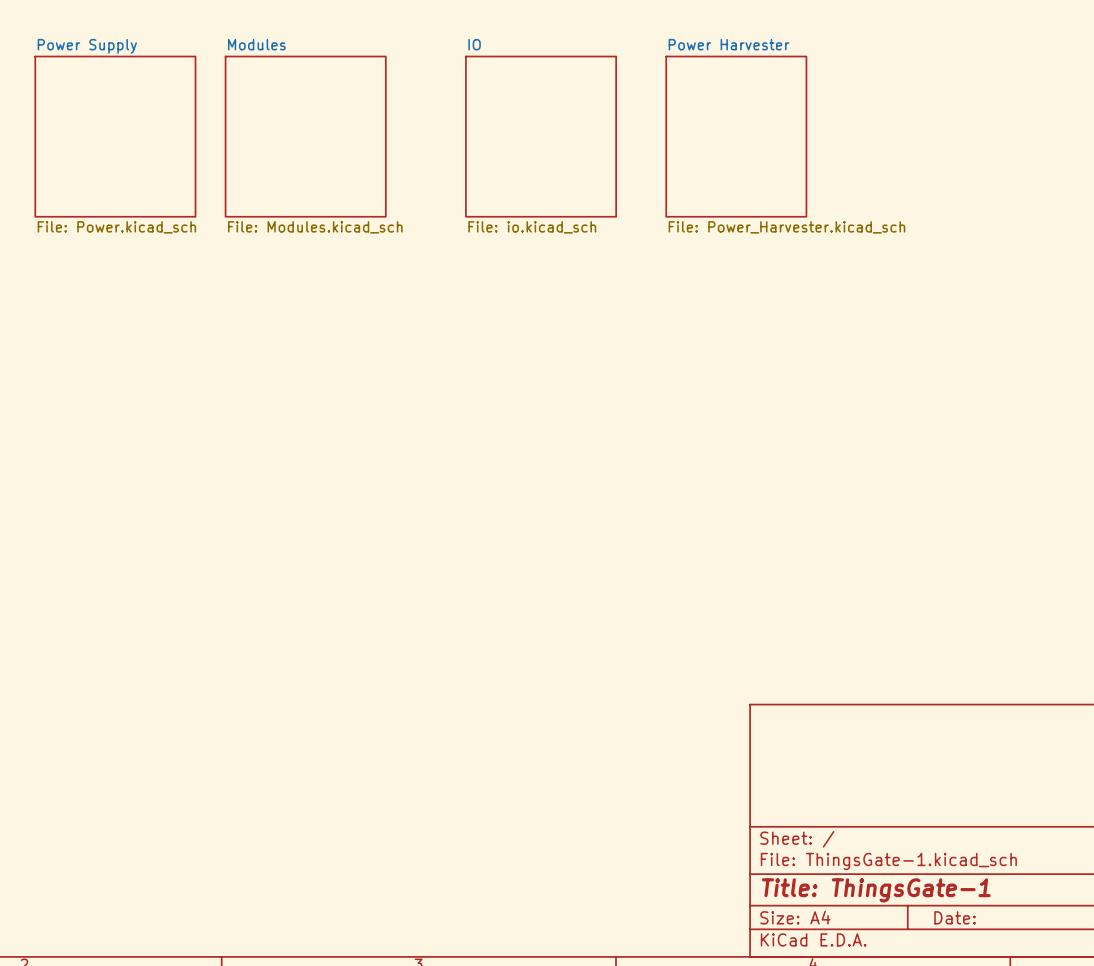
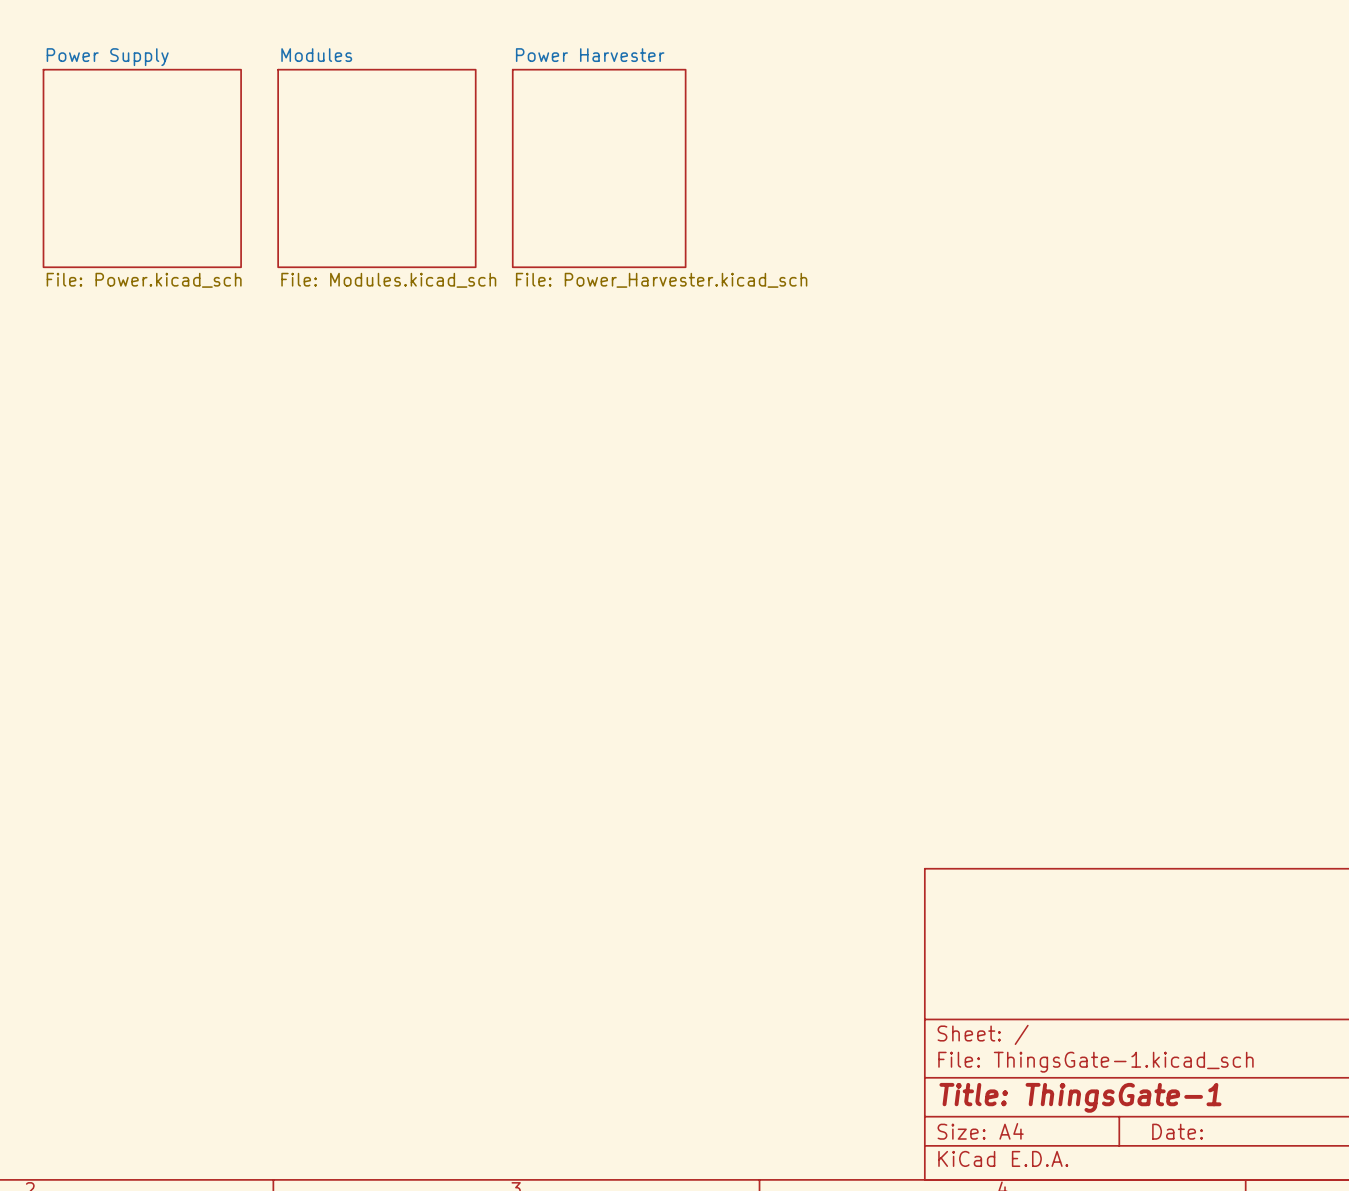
sheet Power Harvester: none -> File: Power_Harvester.kicad_sch (599, 168)
sheet IO: File: io.kicad_sch (541, 136) -> none
sheet Power Harvester: File: Power_Harvester.kicad_sch (736, 136) -> none

